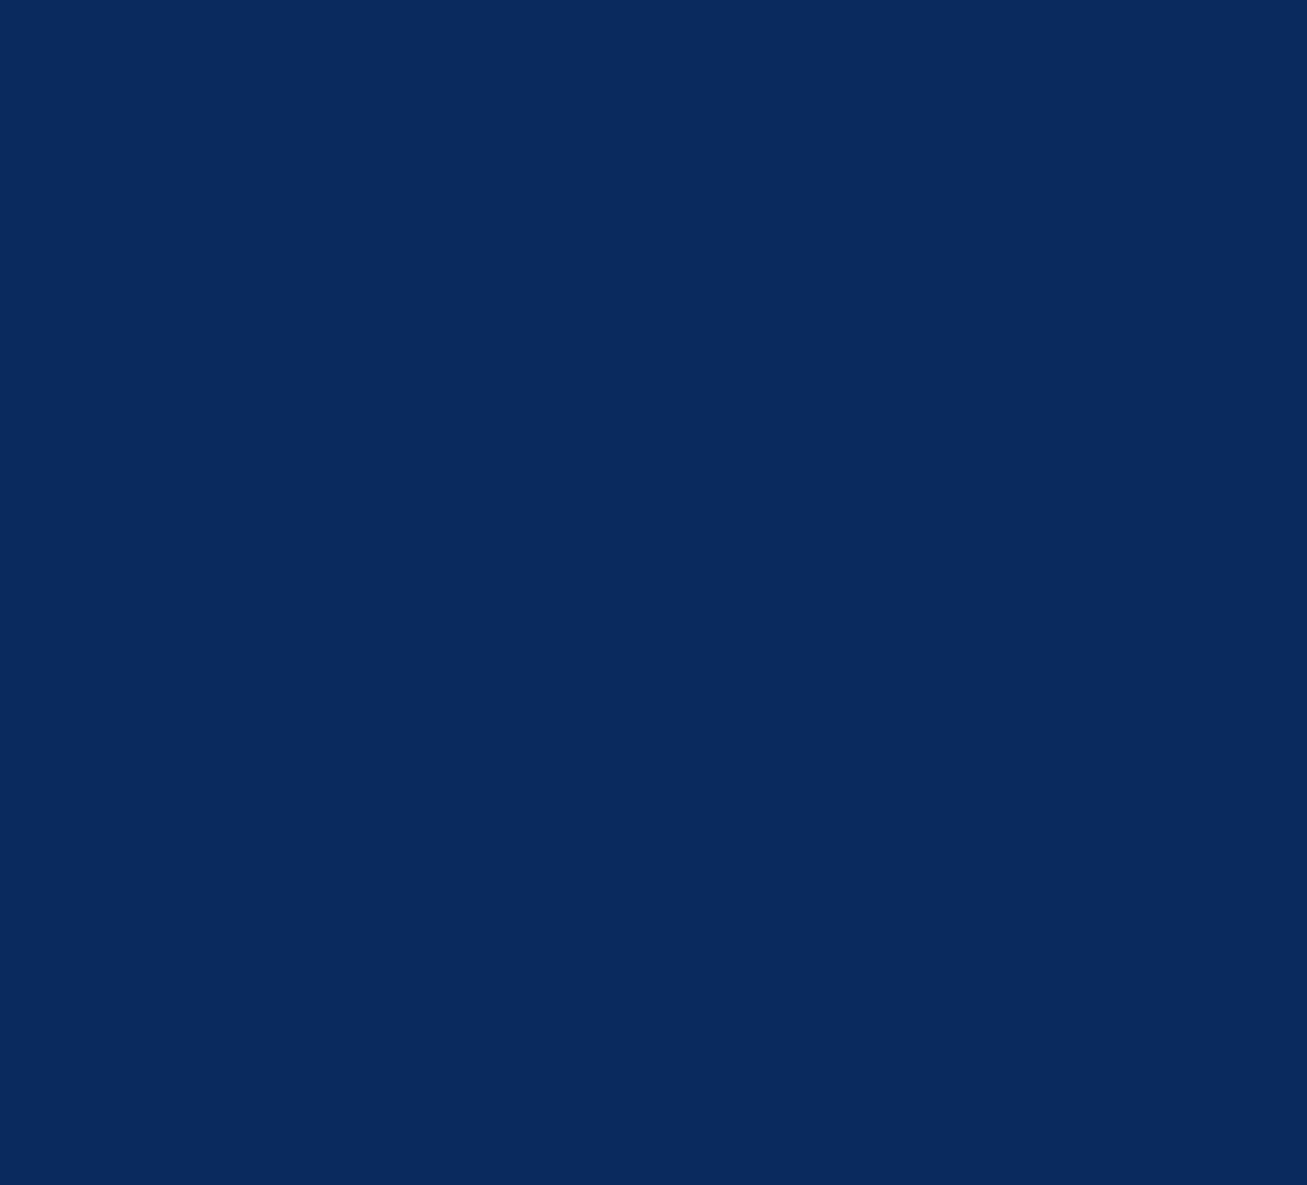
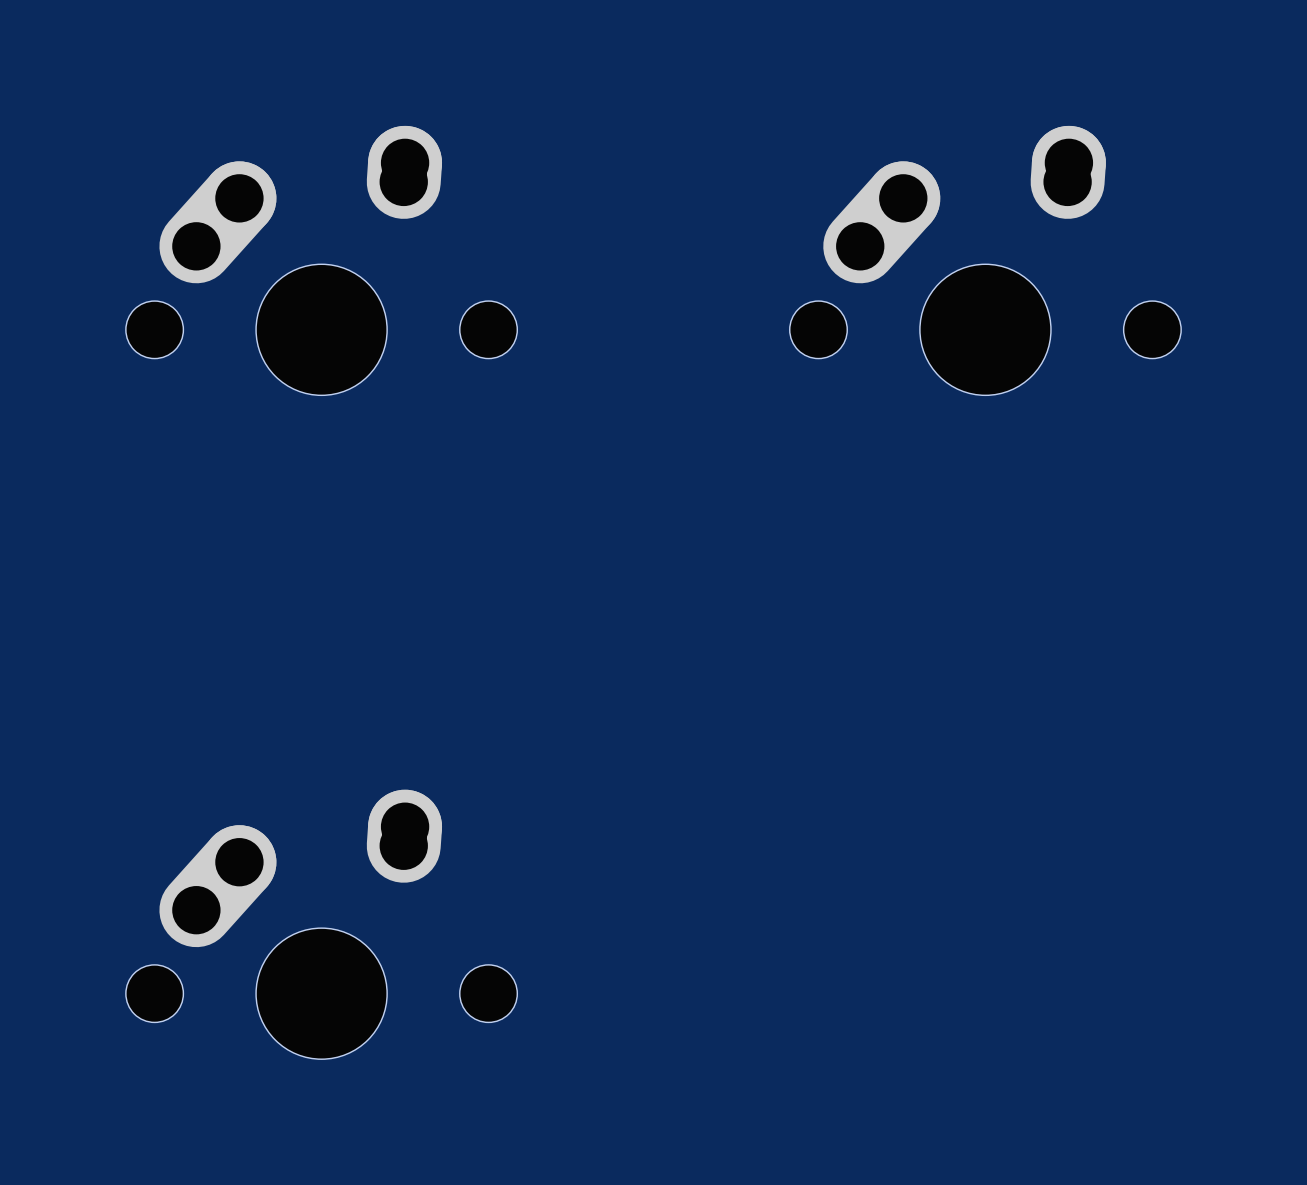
part: none -> (321, 260)
part: none -> (985, 260)
part: none -> (321, 924)

